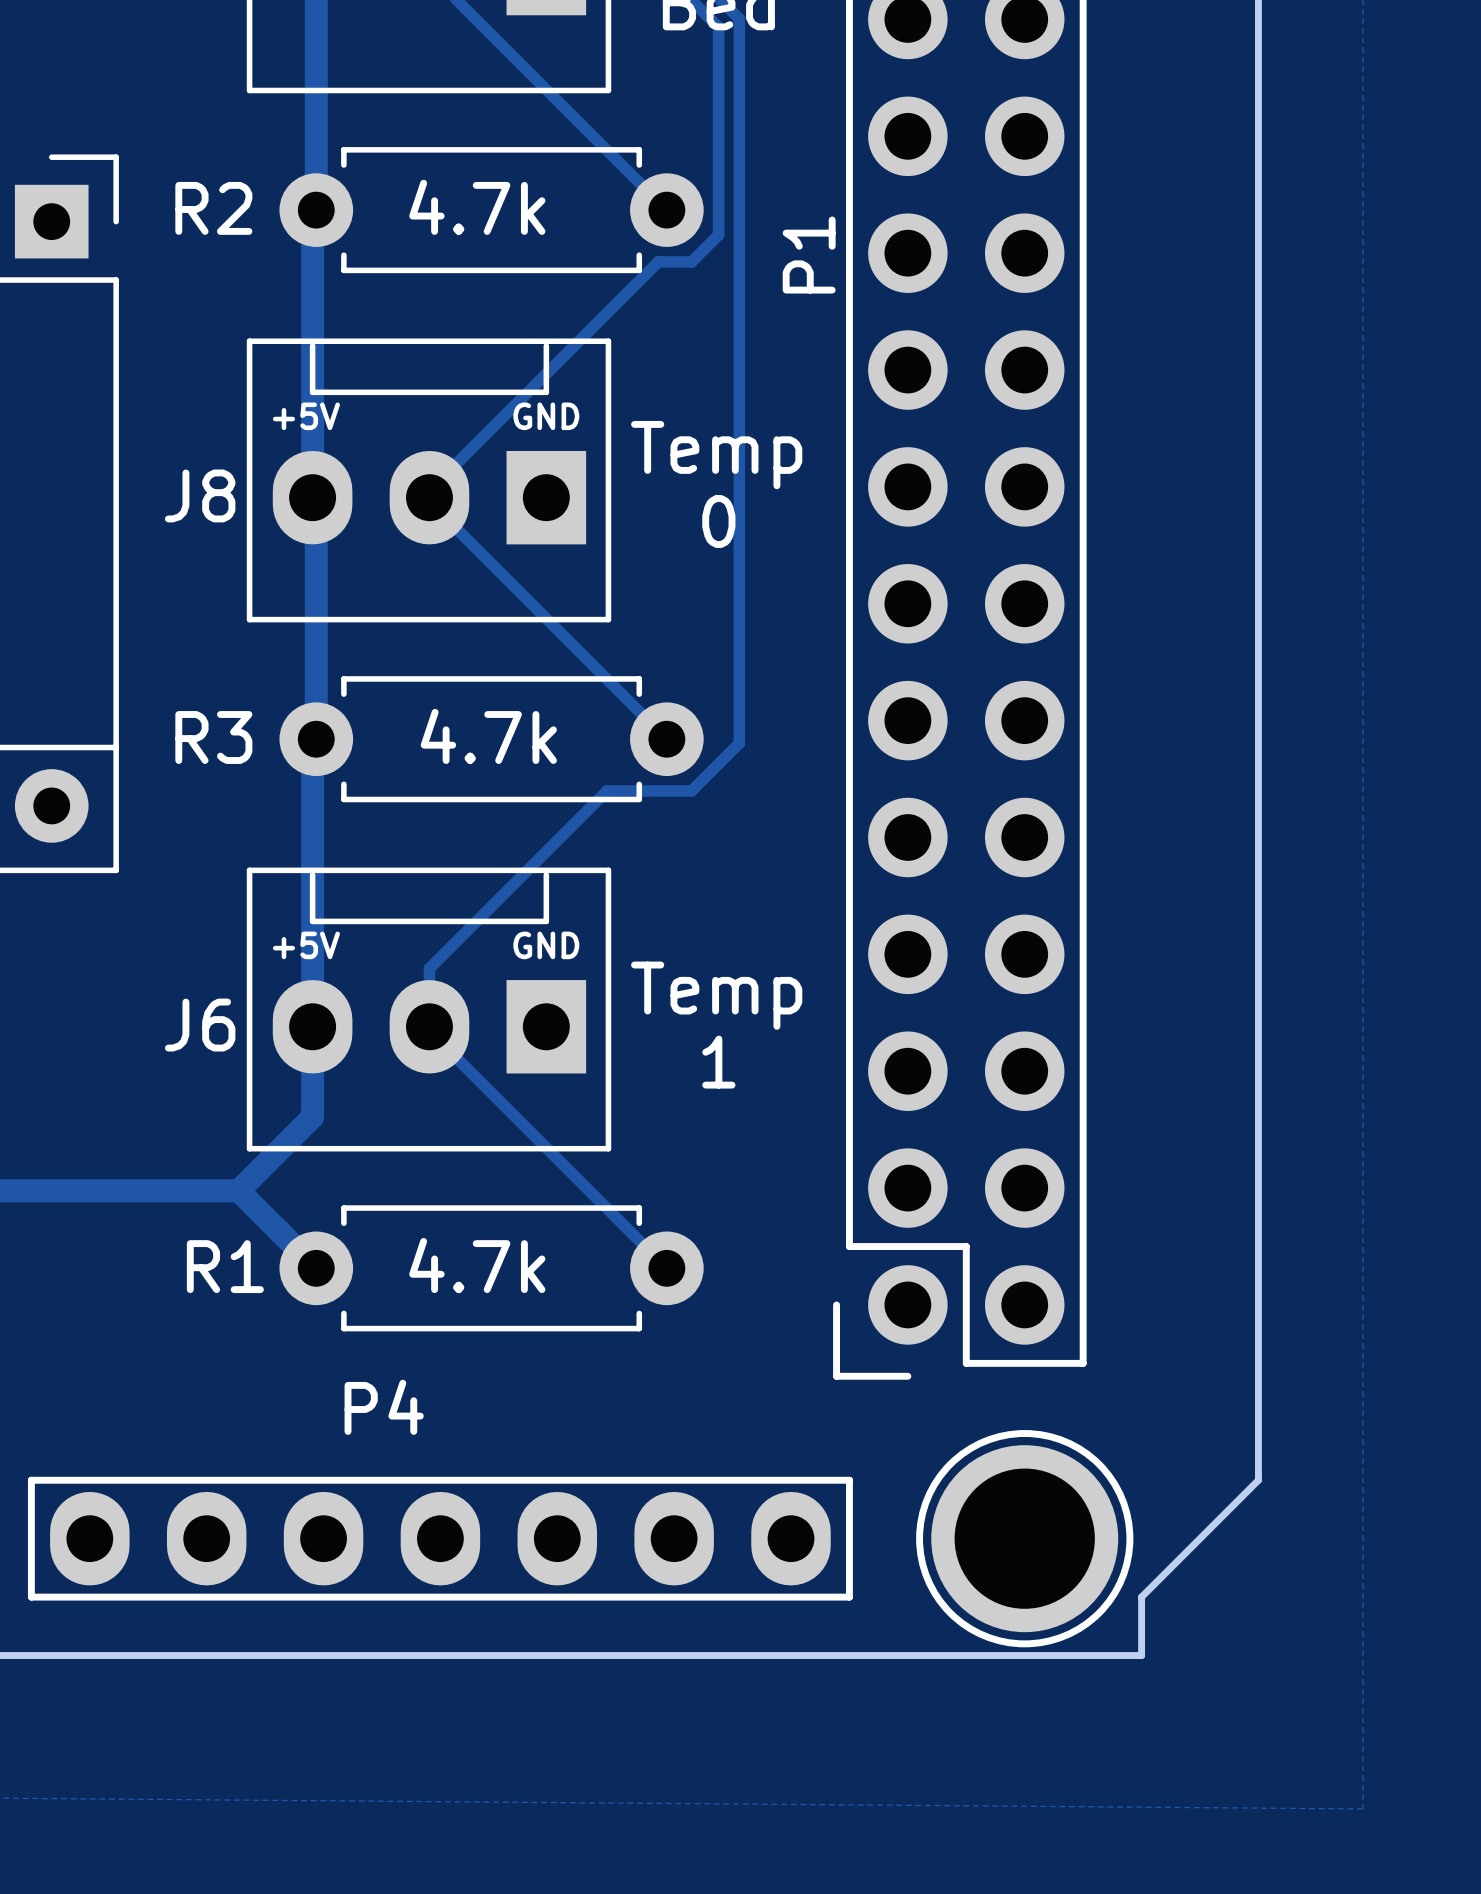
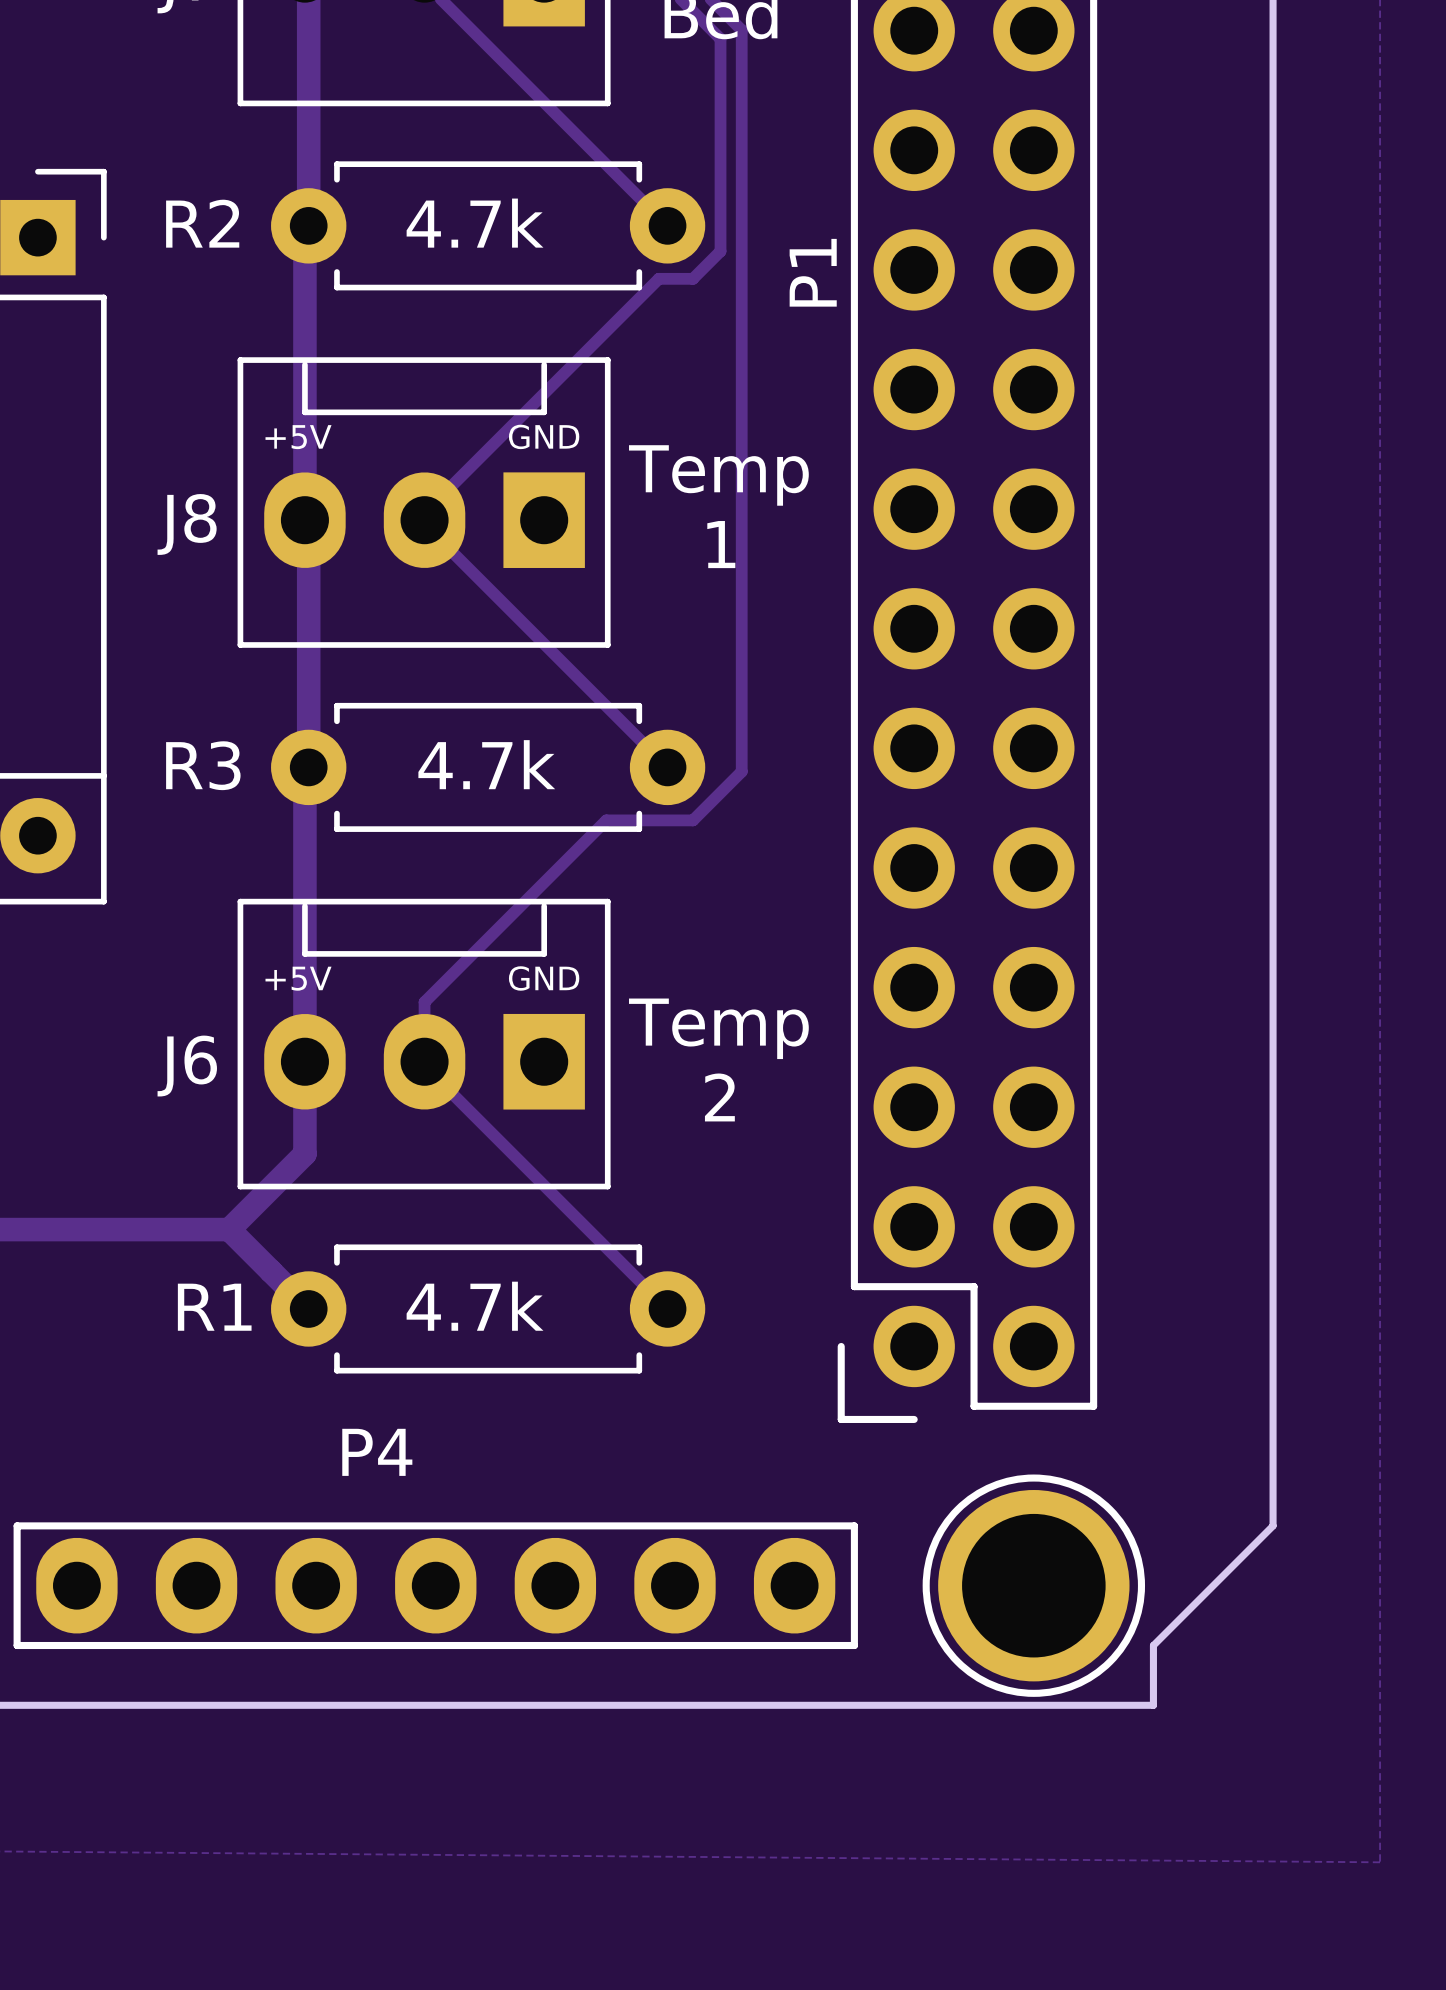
text: 0 (718, 521) -> 1 (721, 544)
text: 1 (718, 1062) -> 2 (719, 1097)

